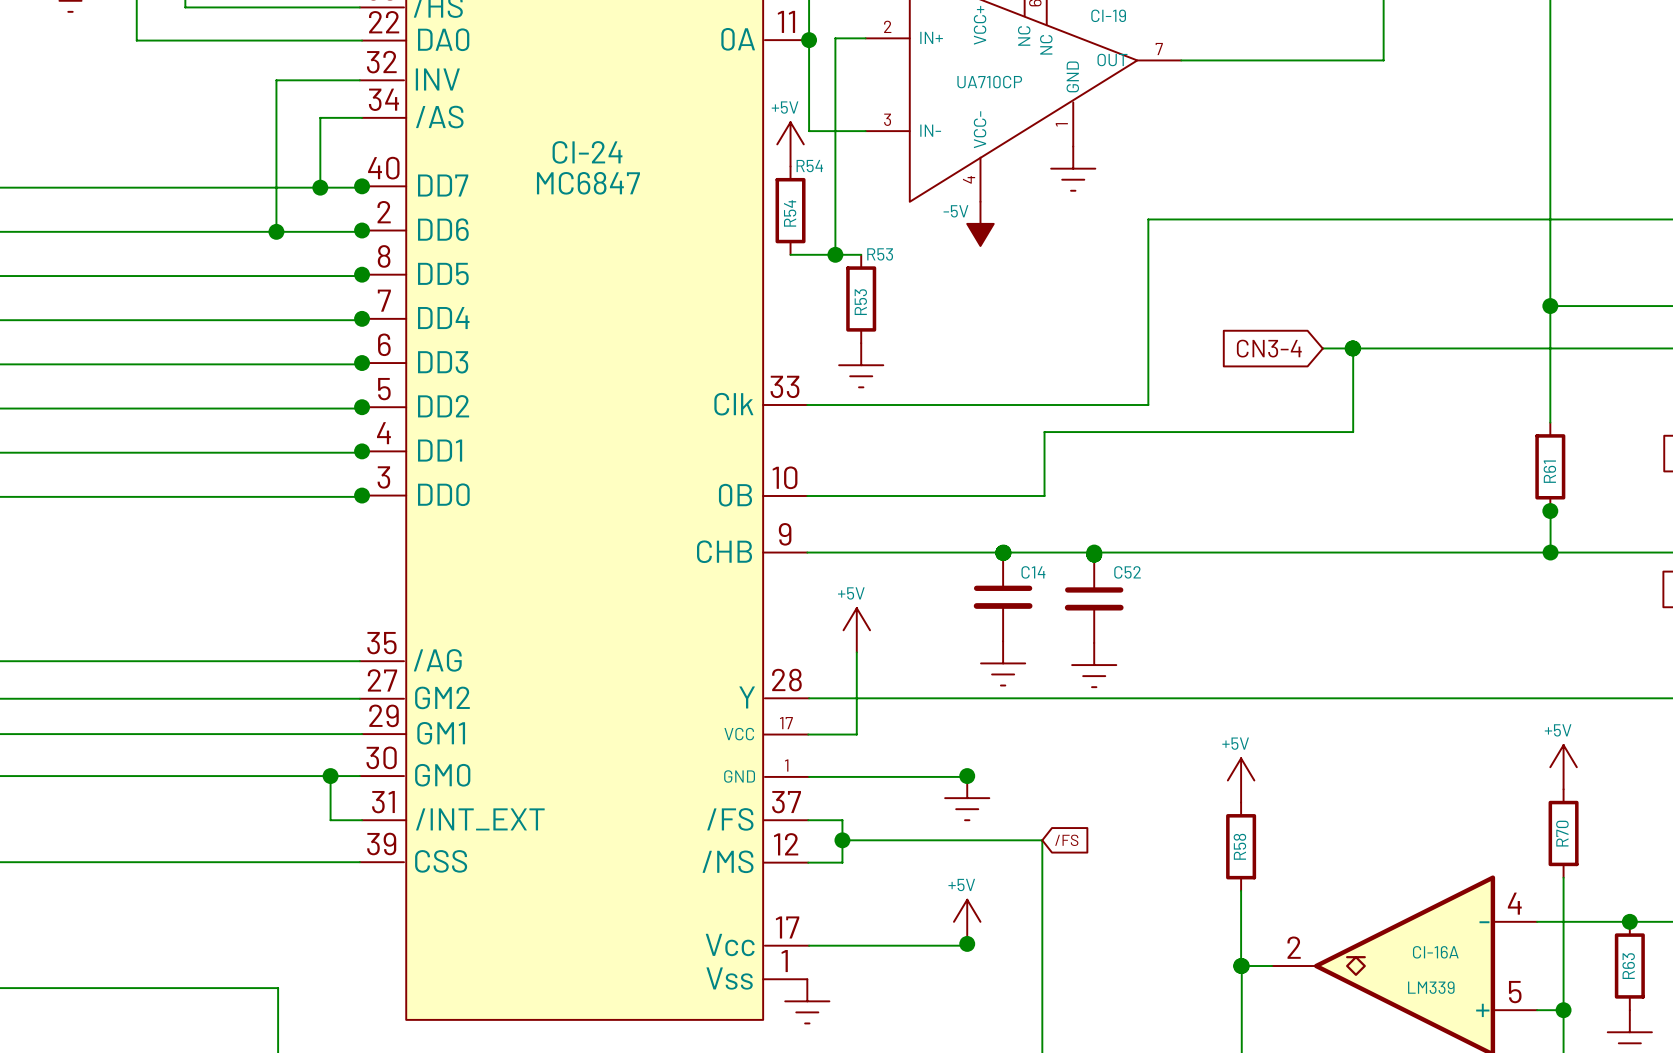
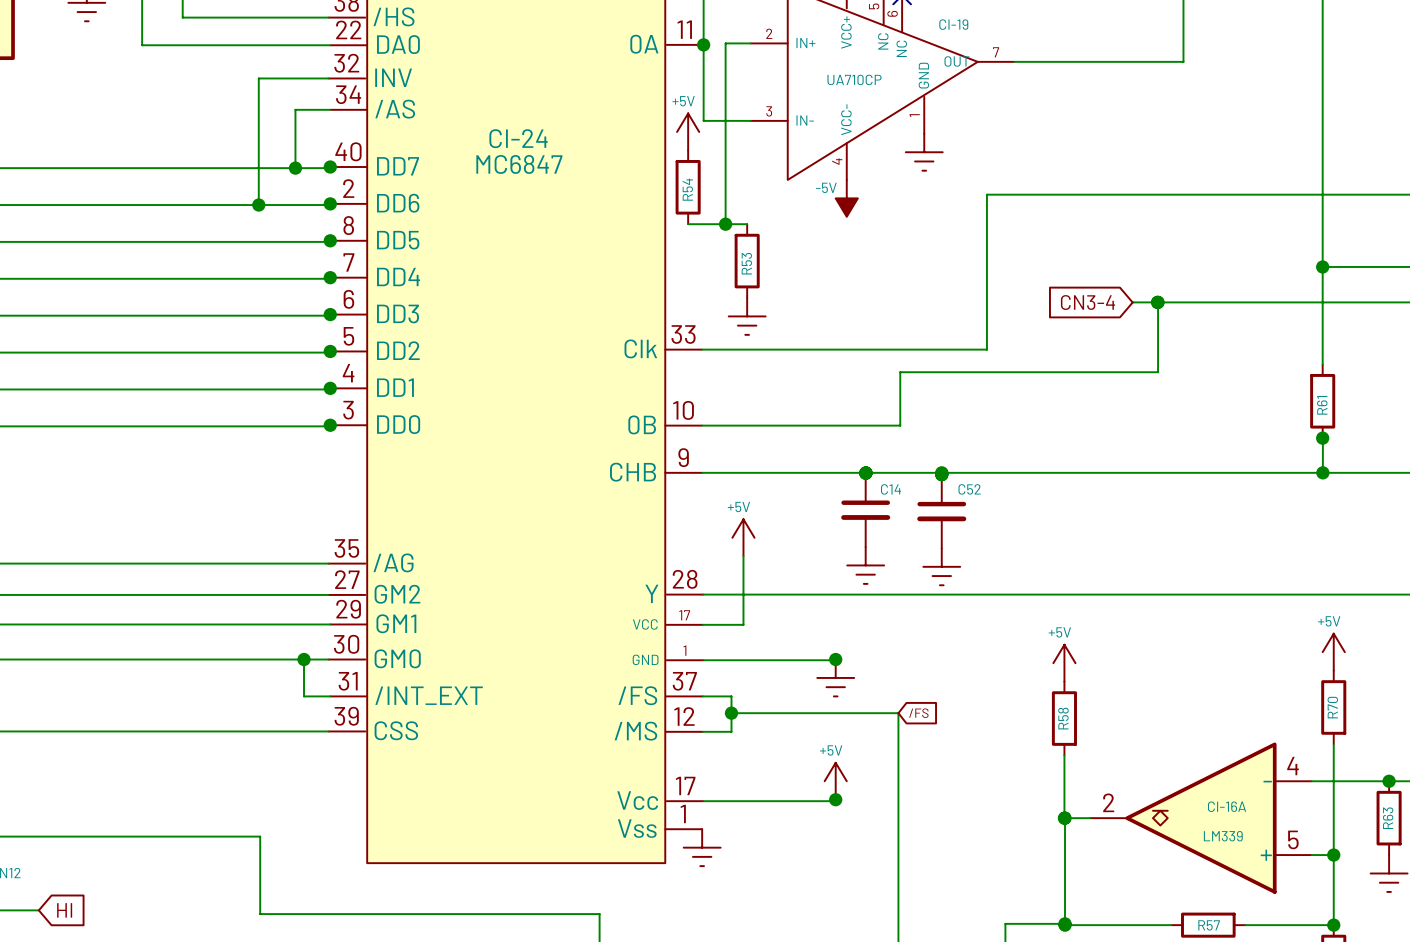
R54 value rotation: 0° (809, 166) -> 90° counterclockwise (687, 189)
R54 value position: R54 (809, 166) -> R54 (687, 189)
R53 value rotation: 0° (880, 254) -> 90° counterclockwise (746, 263)
R53 value position: R53 (880, 254) -> R53 (746, 263)

